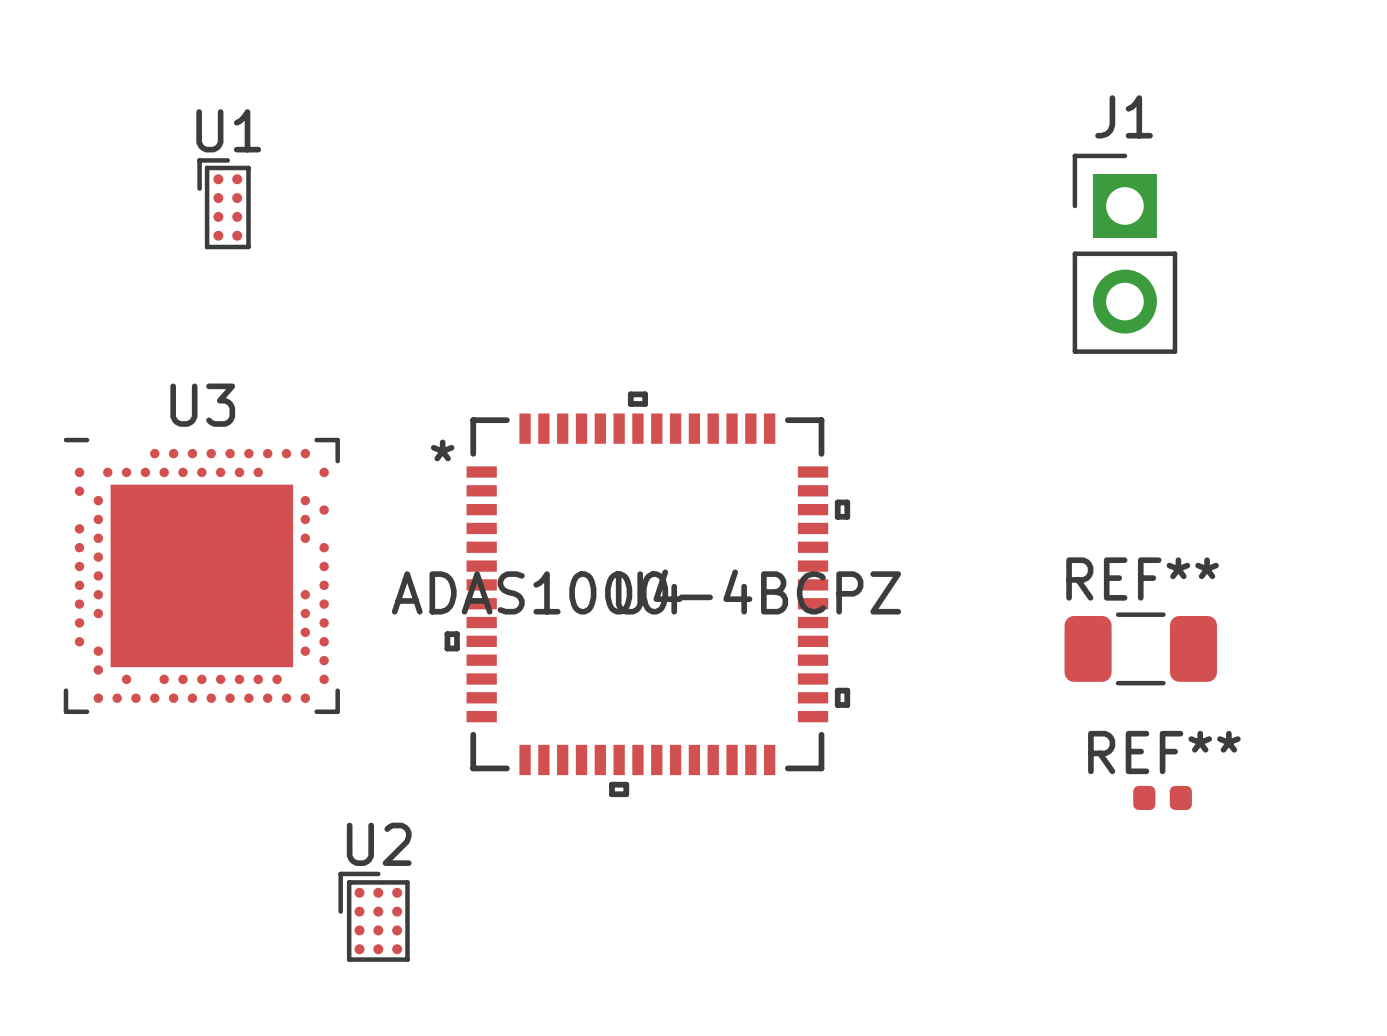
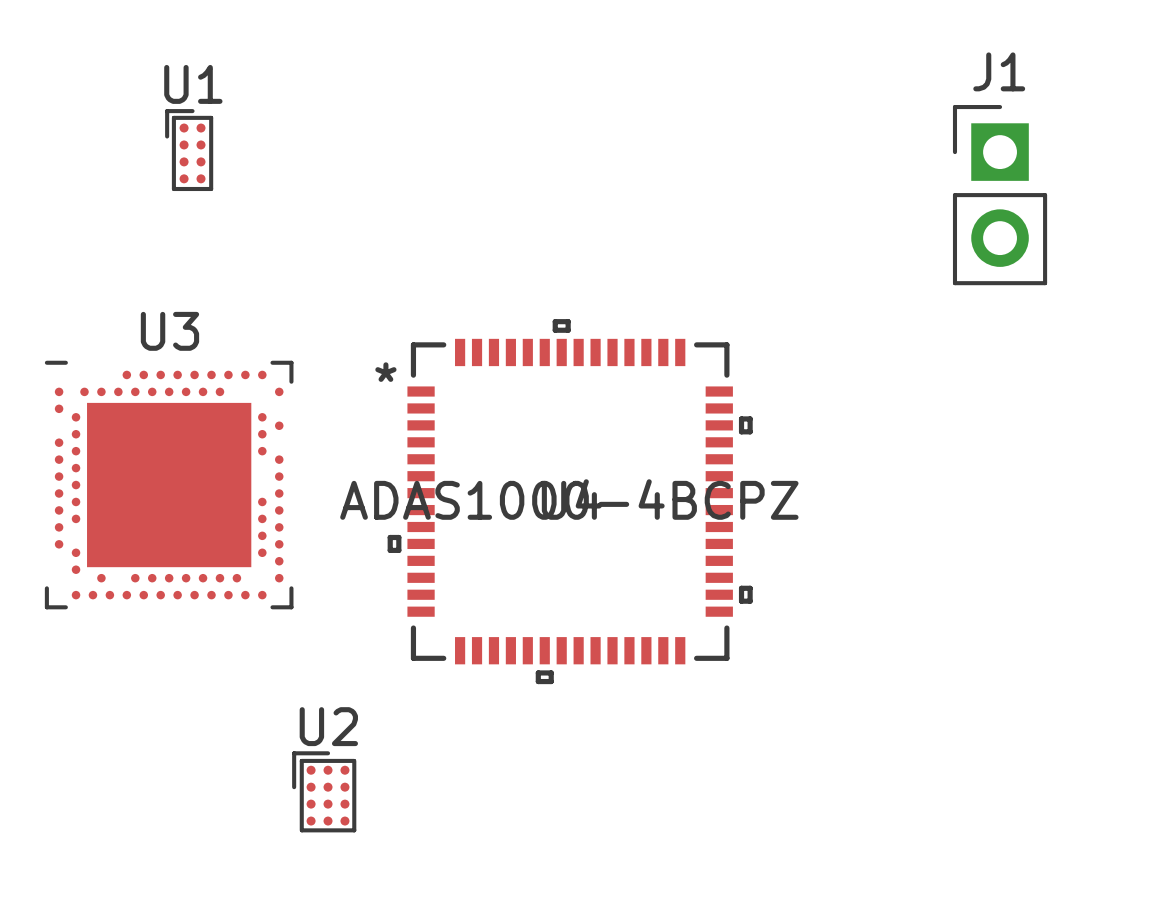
REF**: (1140, 648) -> none
REF**: (1162, 797) -> none

